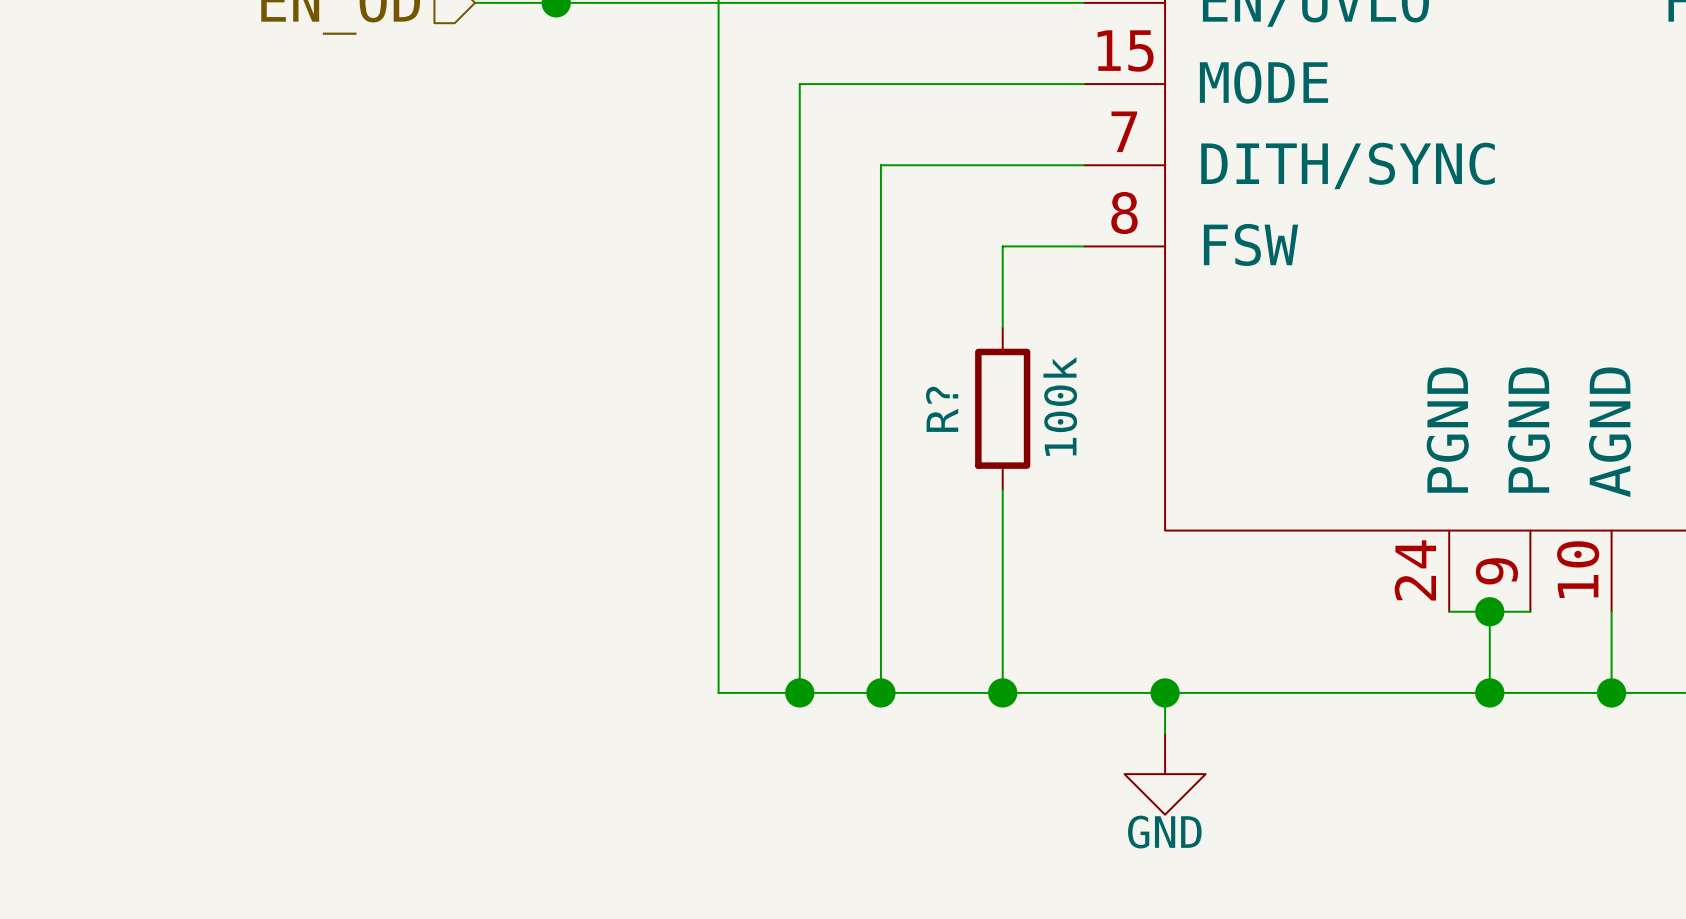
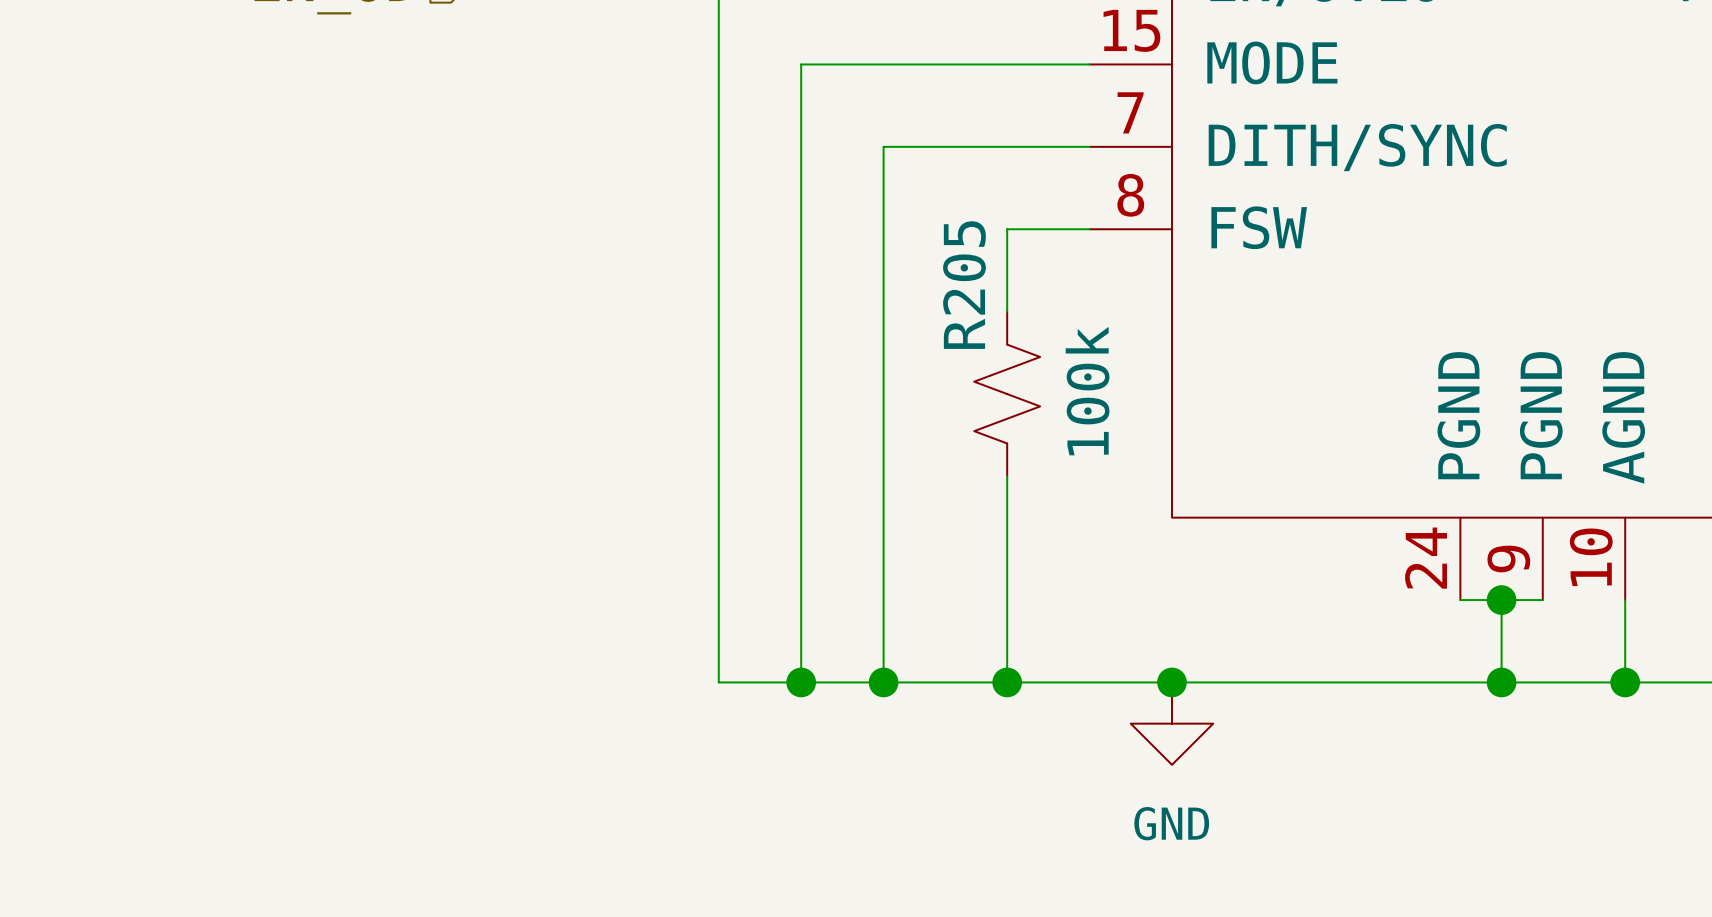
R?: 100k (1002, 408) -> none
R205: none -> 100k (1007, 394)
power symbol position: GND (1165, 774) -> GND (1171, 723)

